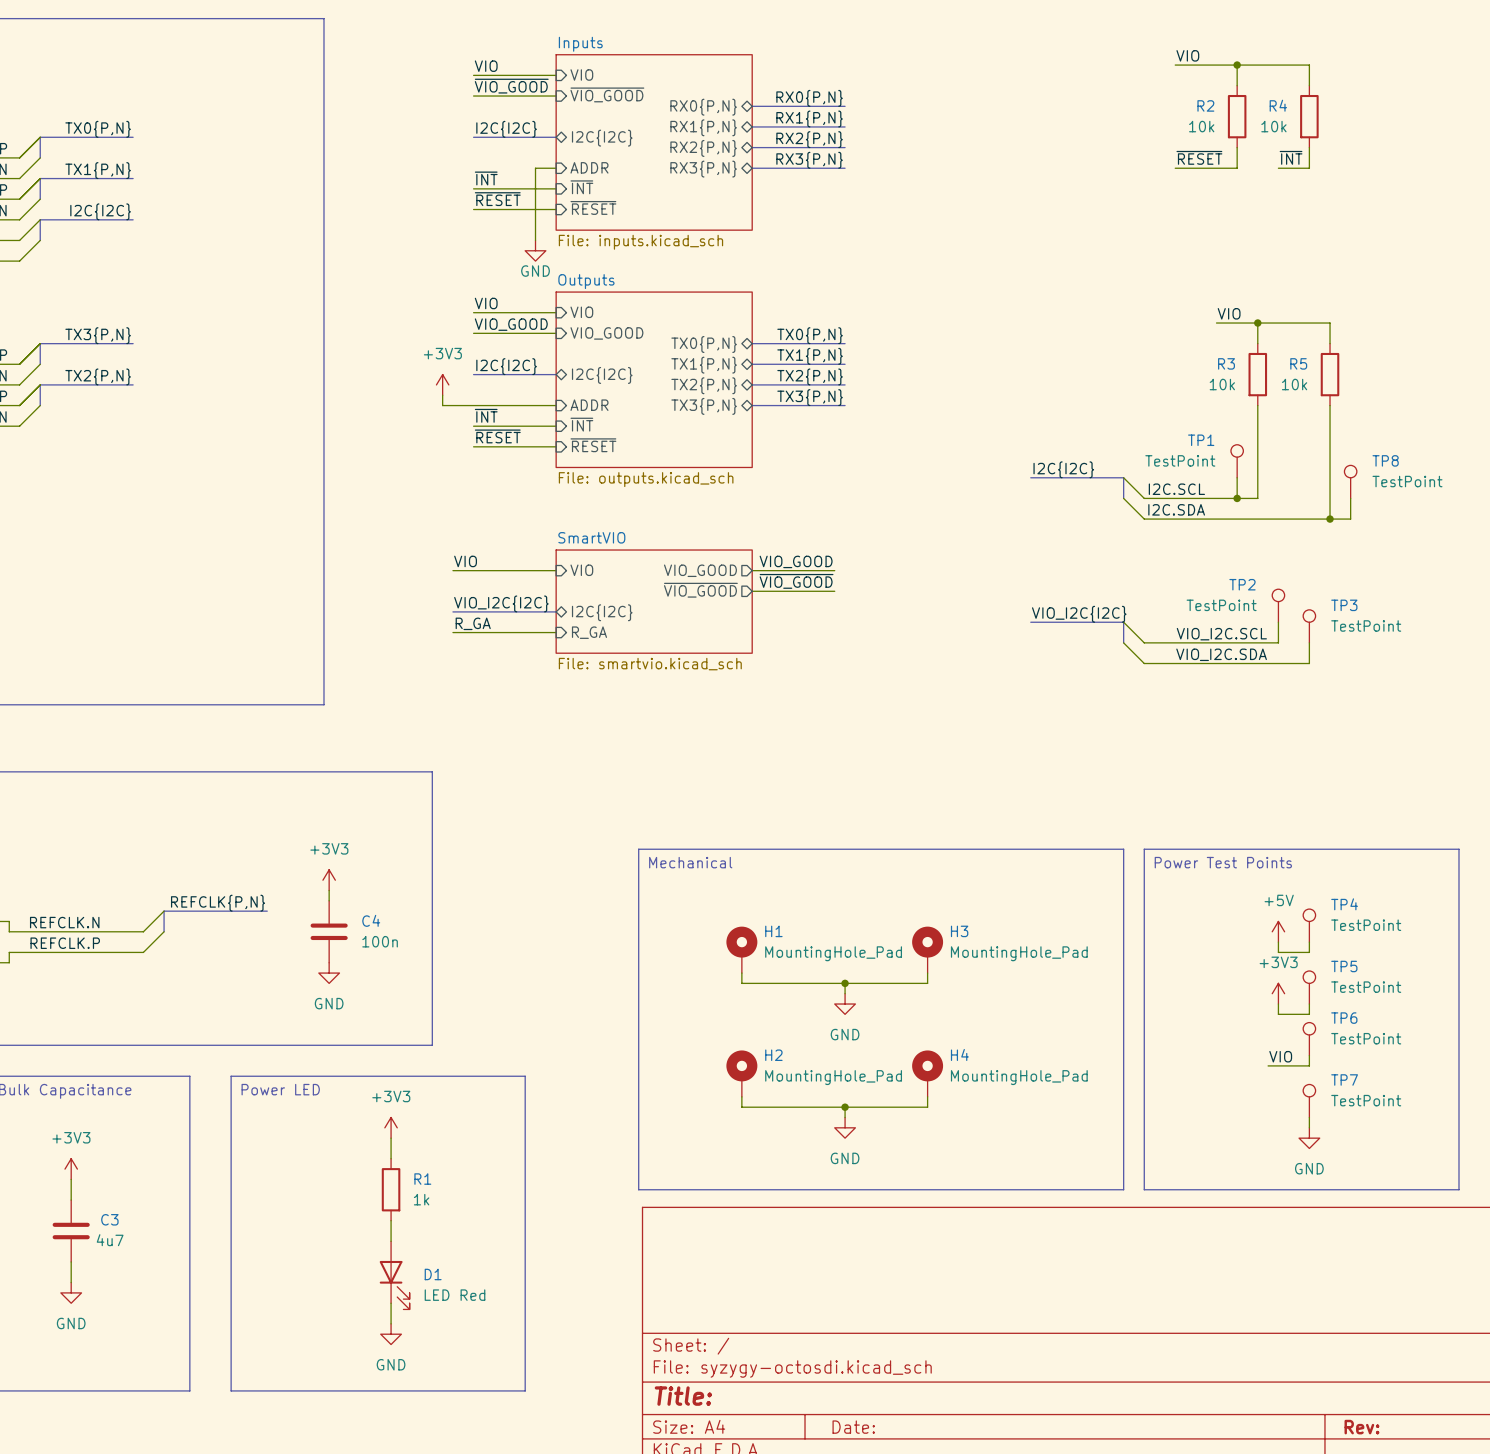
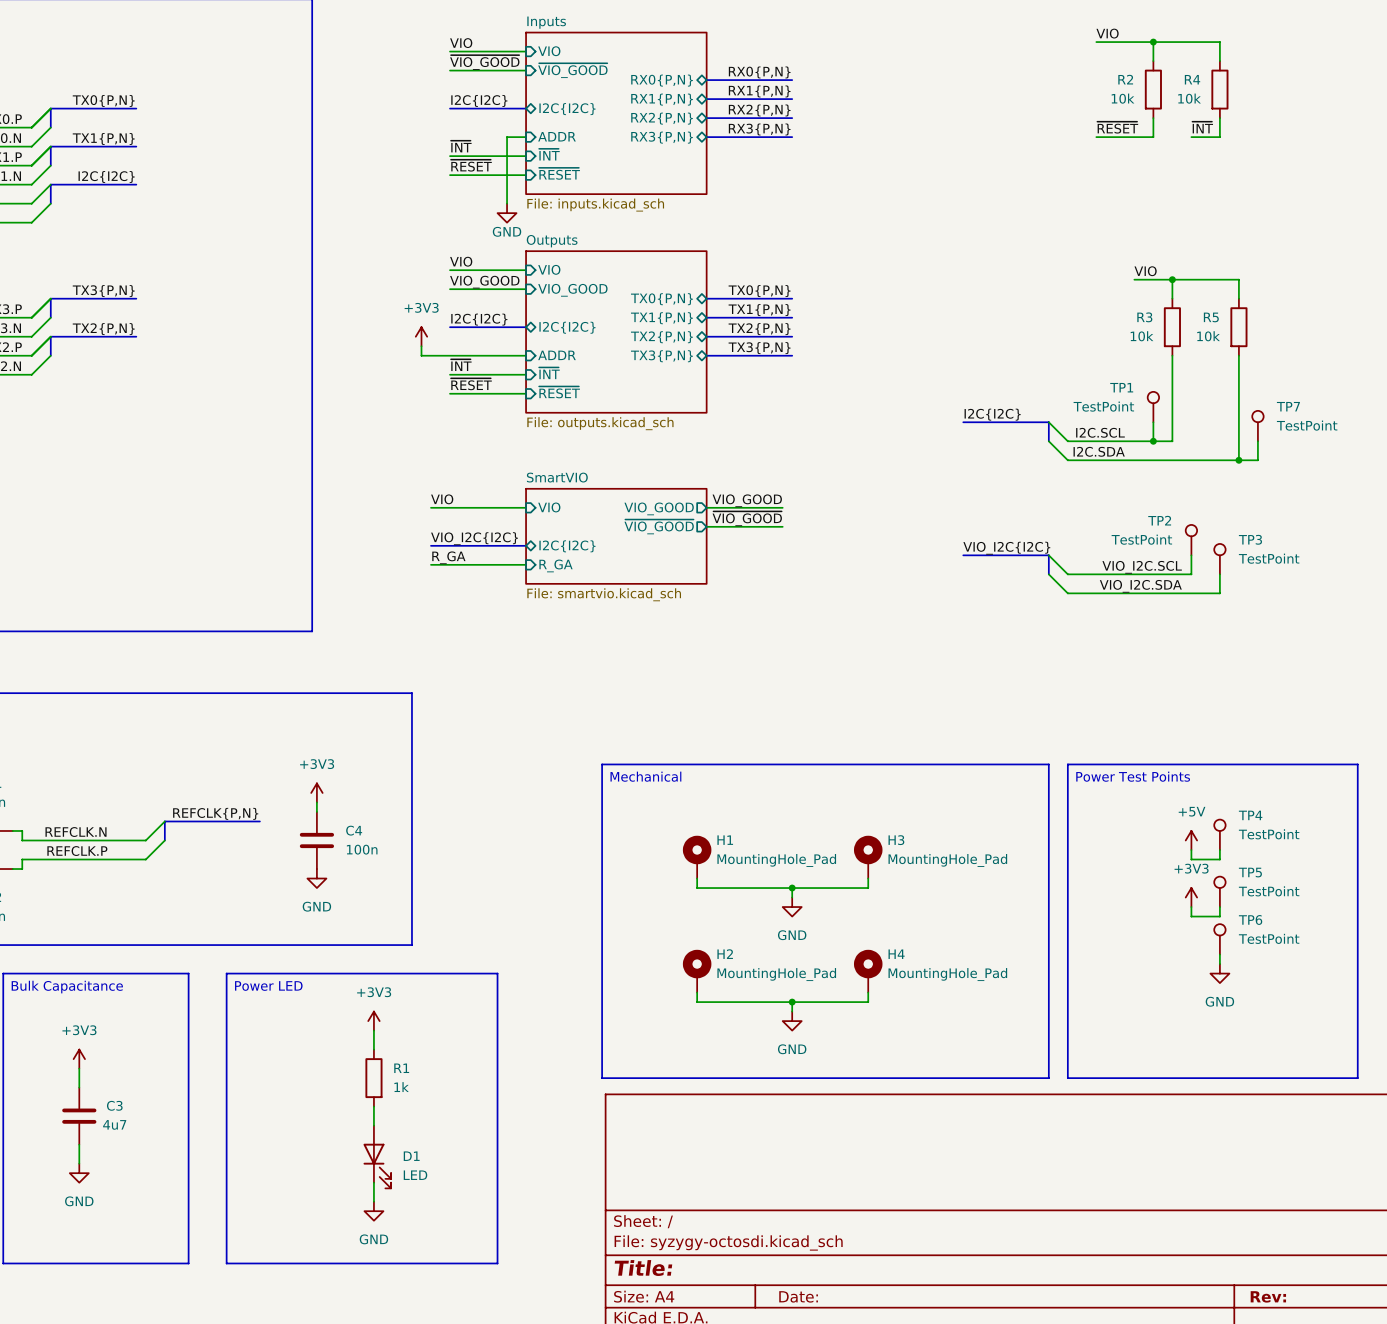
TP8 name: TP8 (1385, 460) -> TP7 (1288, 406)
label: VIO (1280, 1056) -> none
wire: (1268, 1065) (1309, 1065) -> none
TP7: TestPoint (1309, 1101) -> none
wire: (1309, 1117) (1309, 1127) -> none
power symbol position: GND (1309, 1138) -> GND (1219, 973)
D1 value: LED Red (455, 1295) -> LED (415, 1175)

